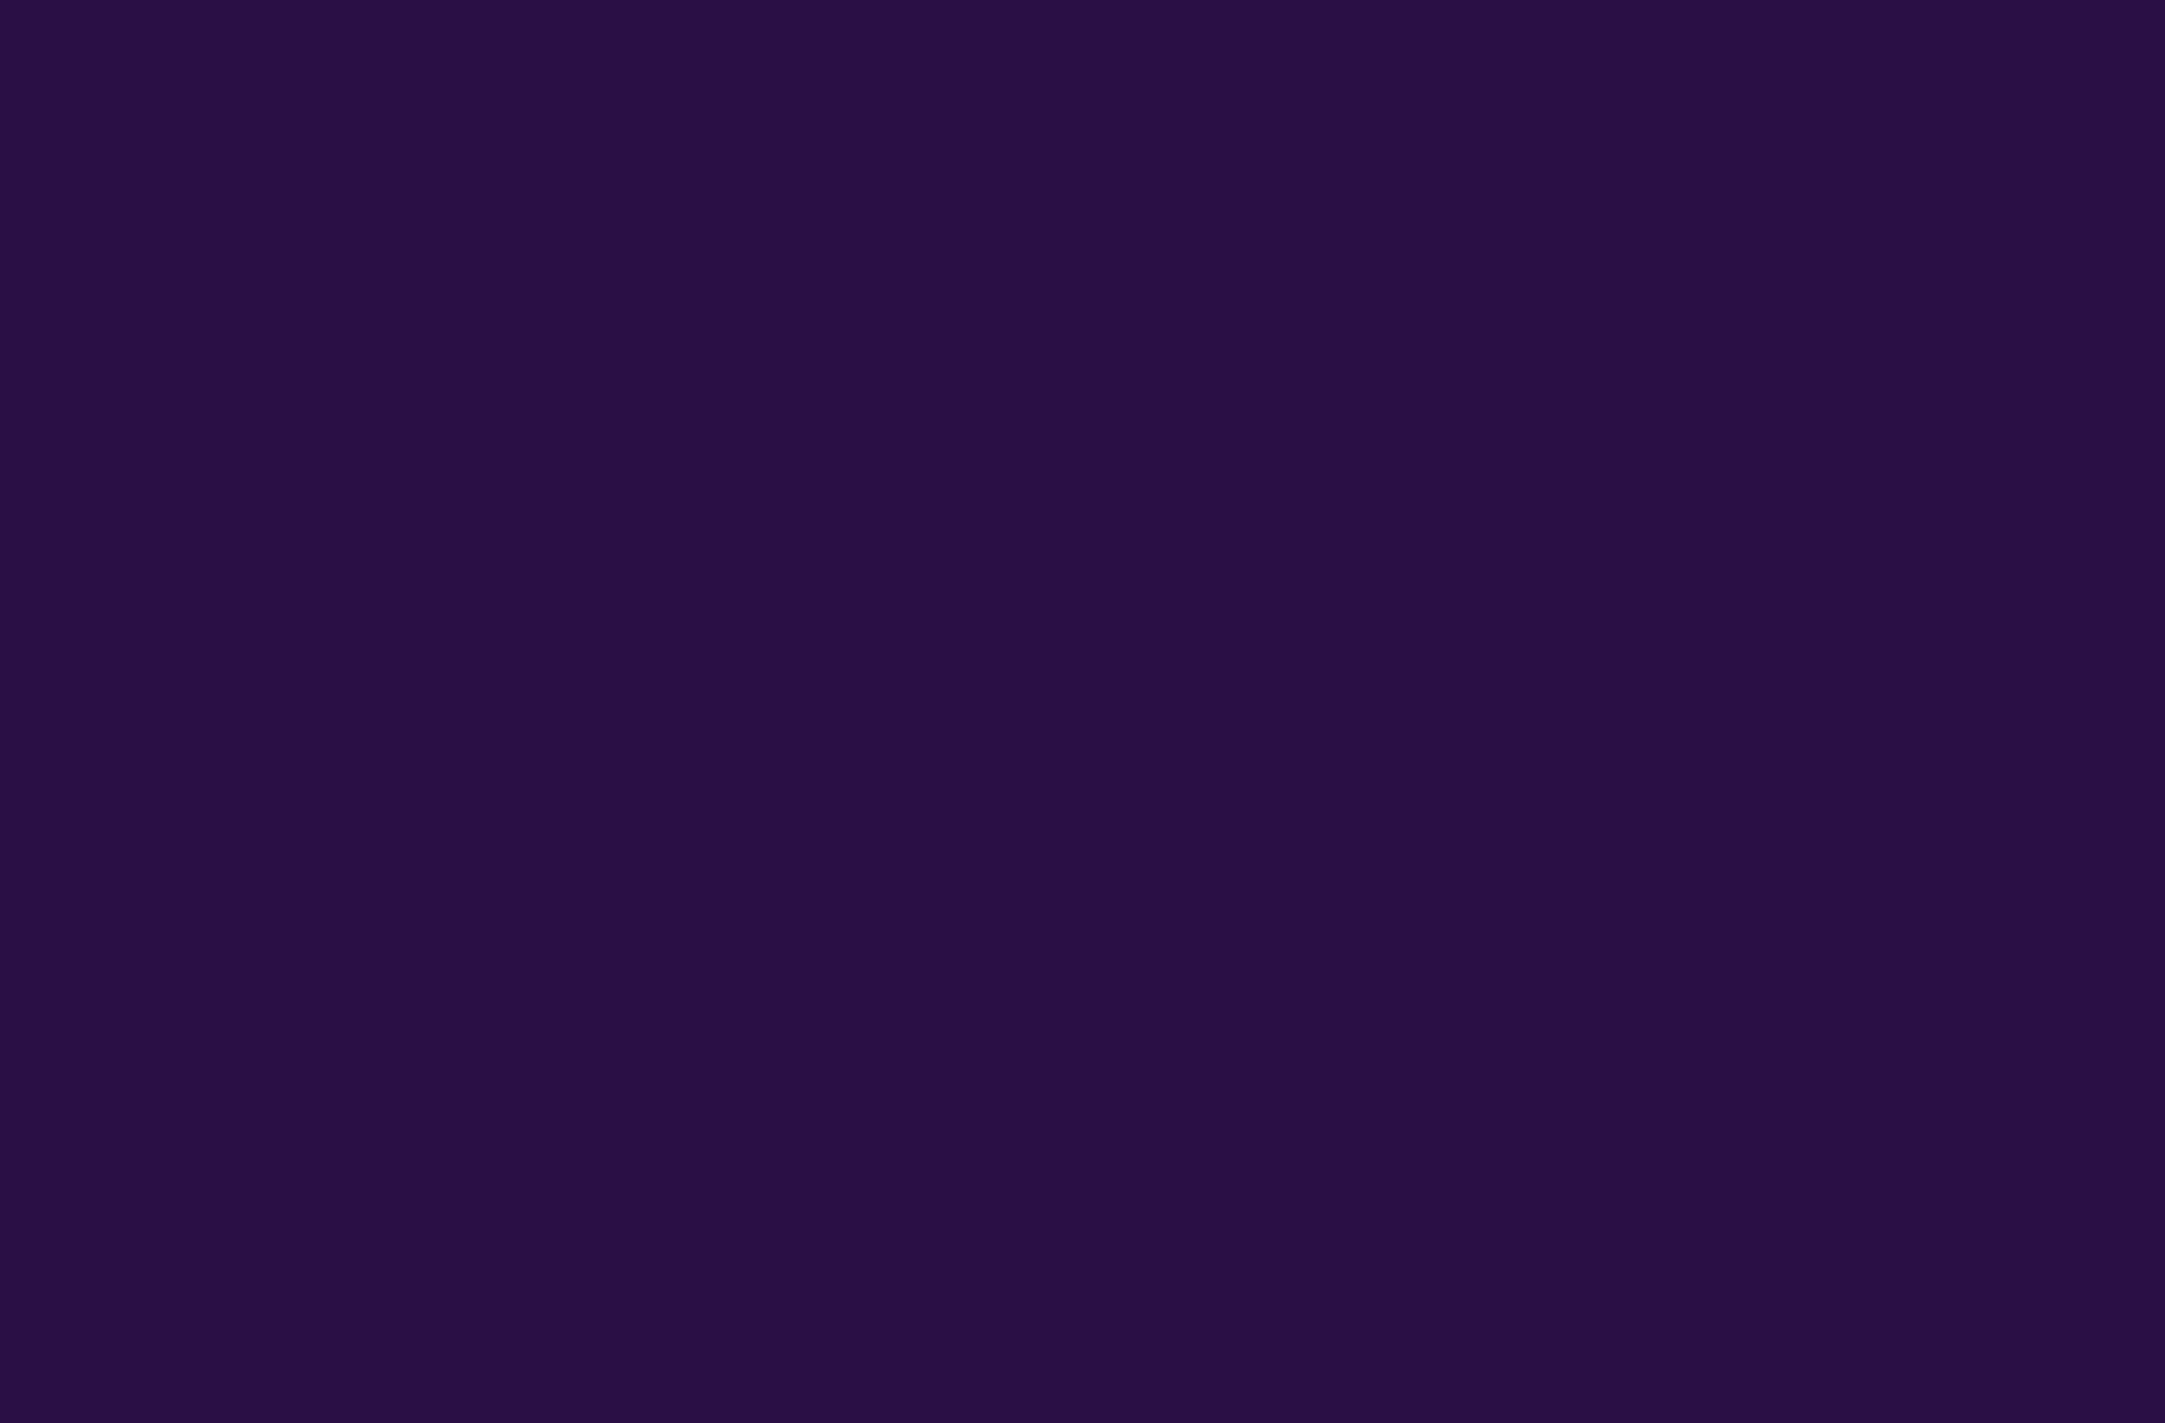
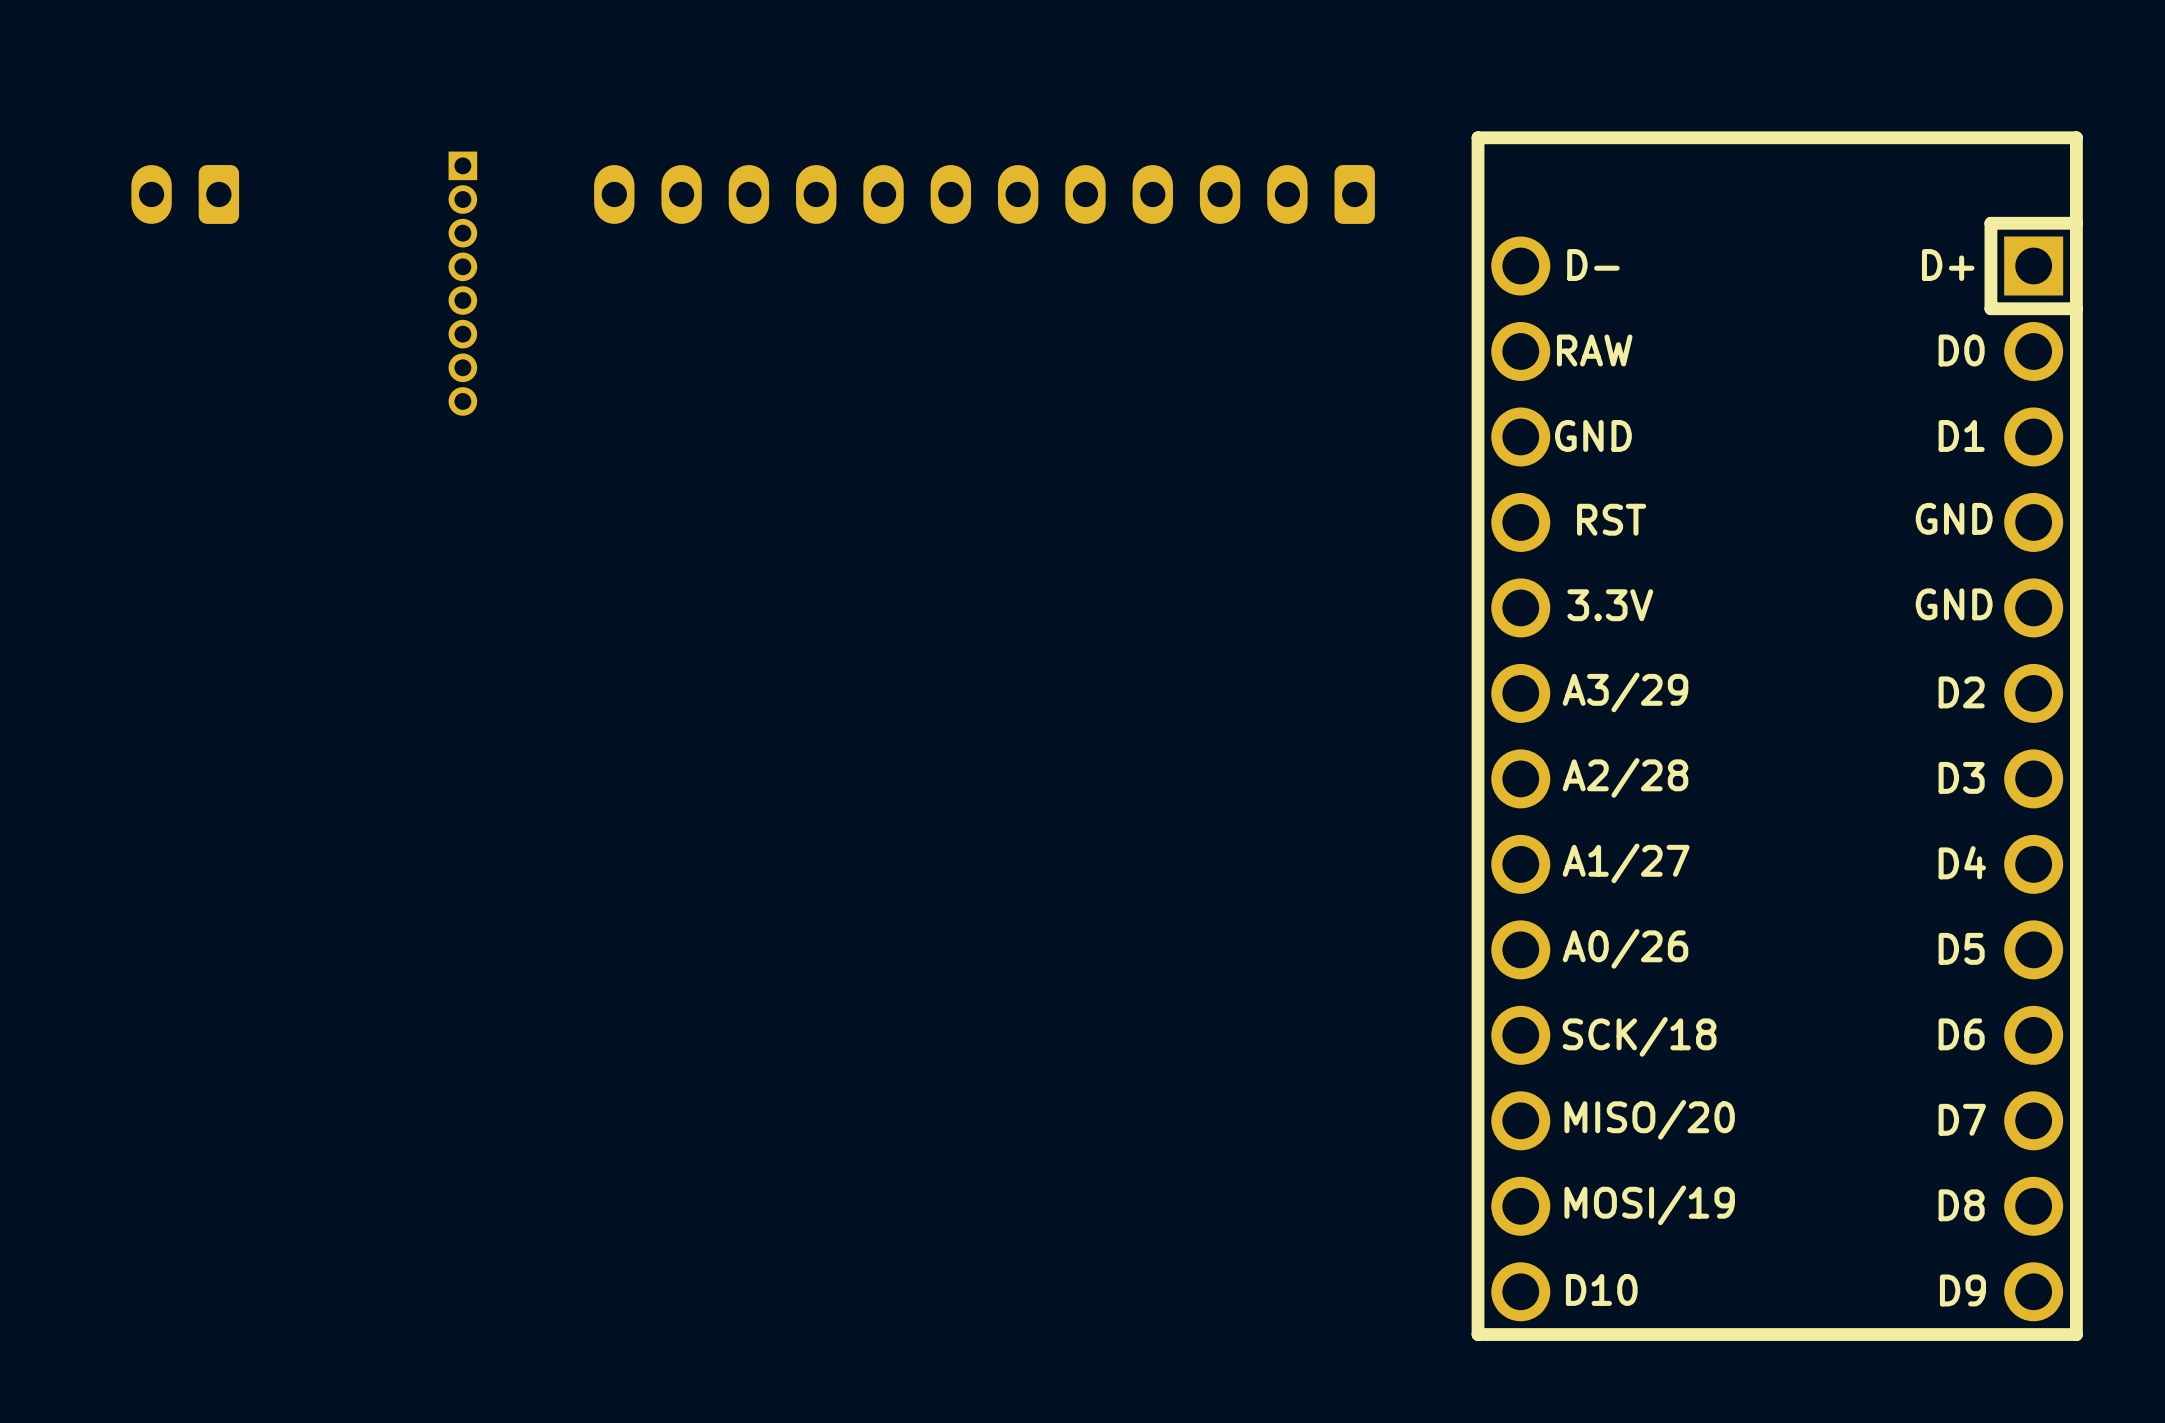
part: none -> (185, 194)
part: none -> (984, 194)
part: none -> (462, 283)
part: none -> (1777, 736)

